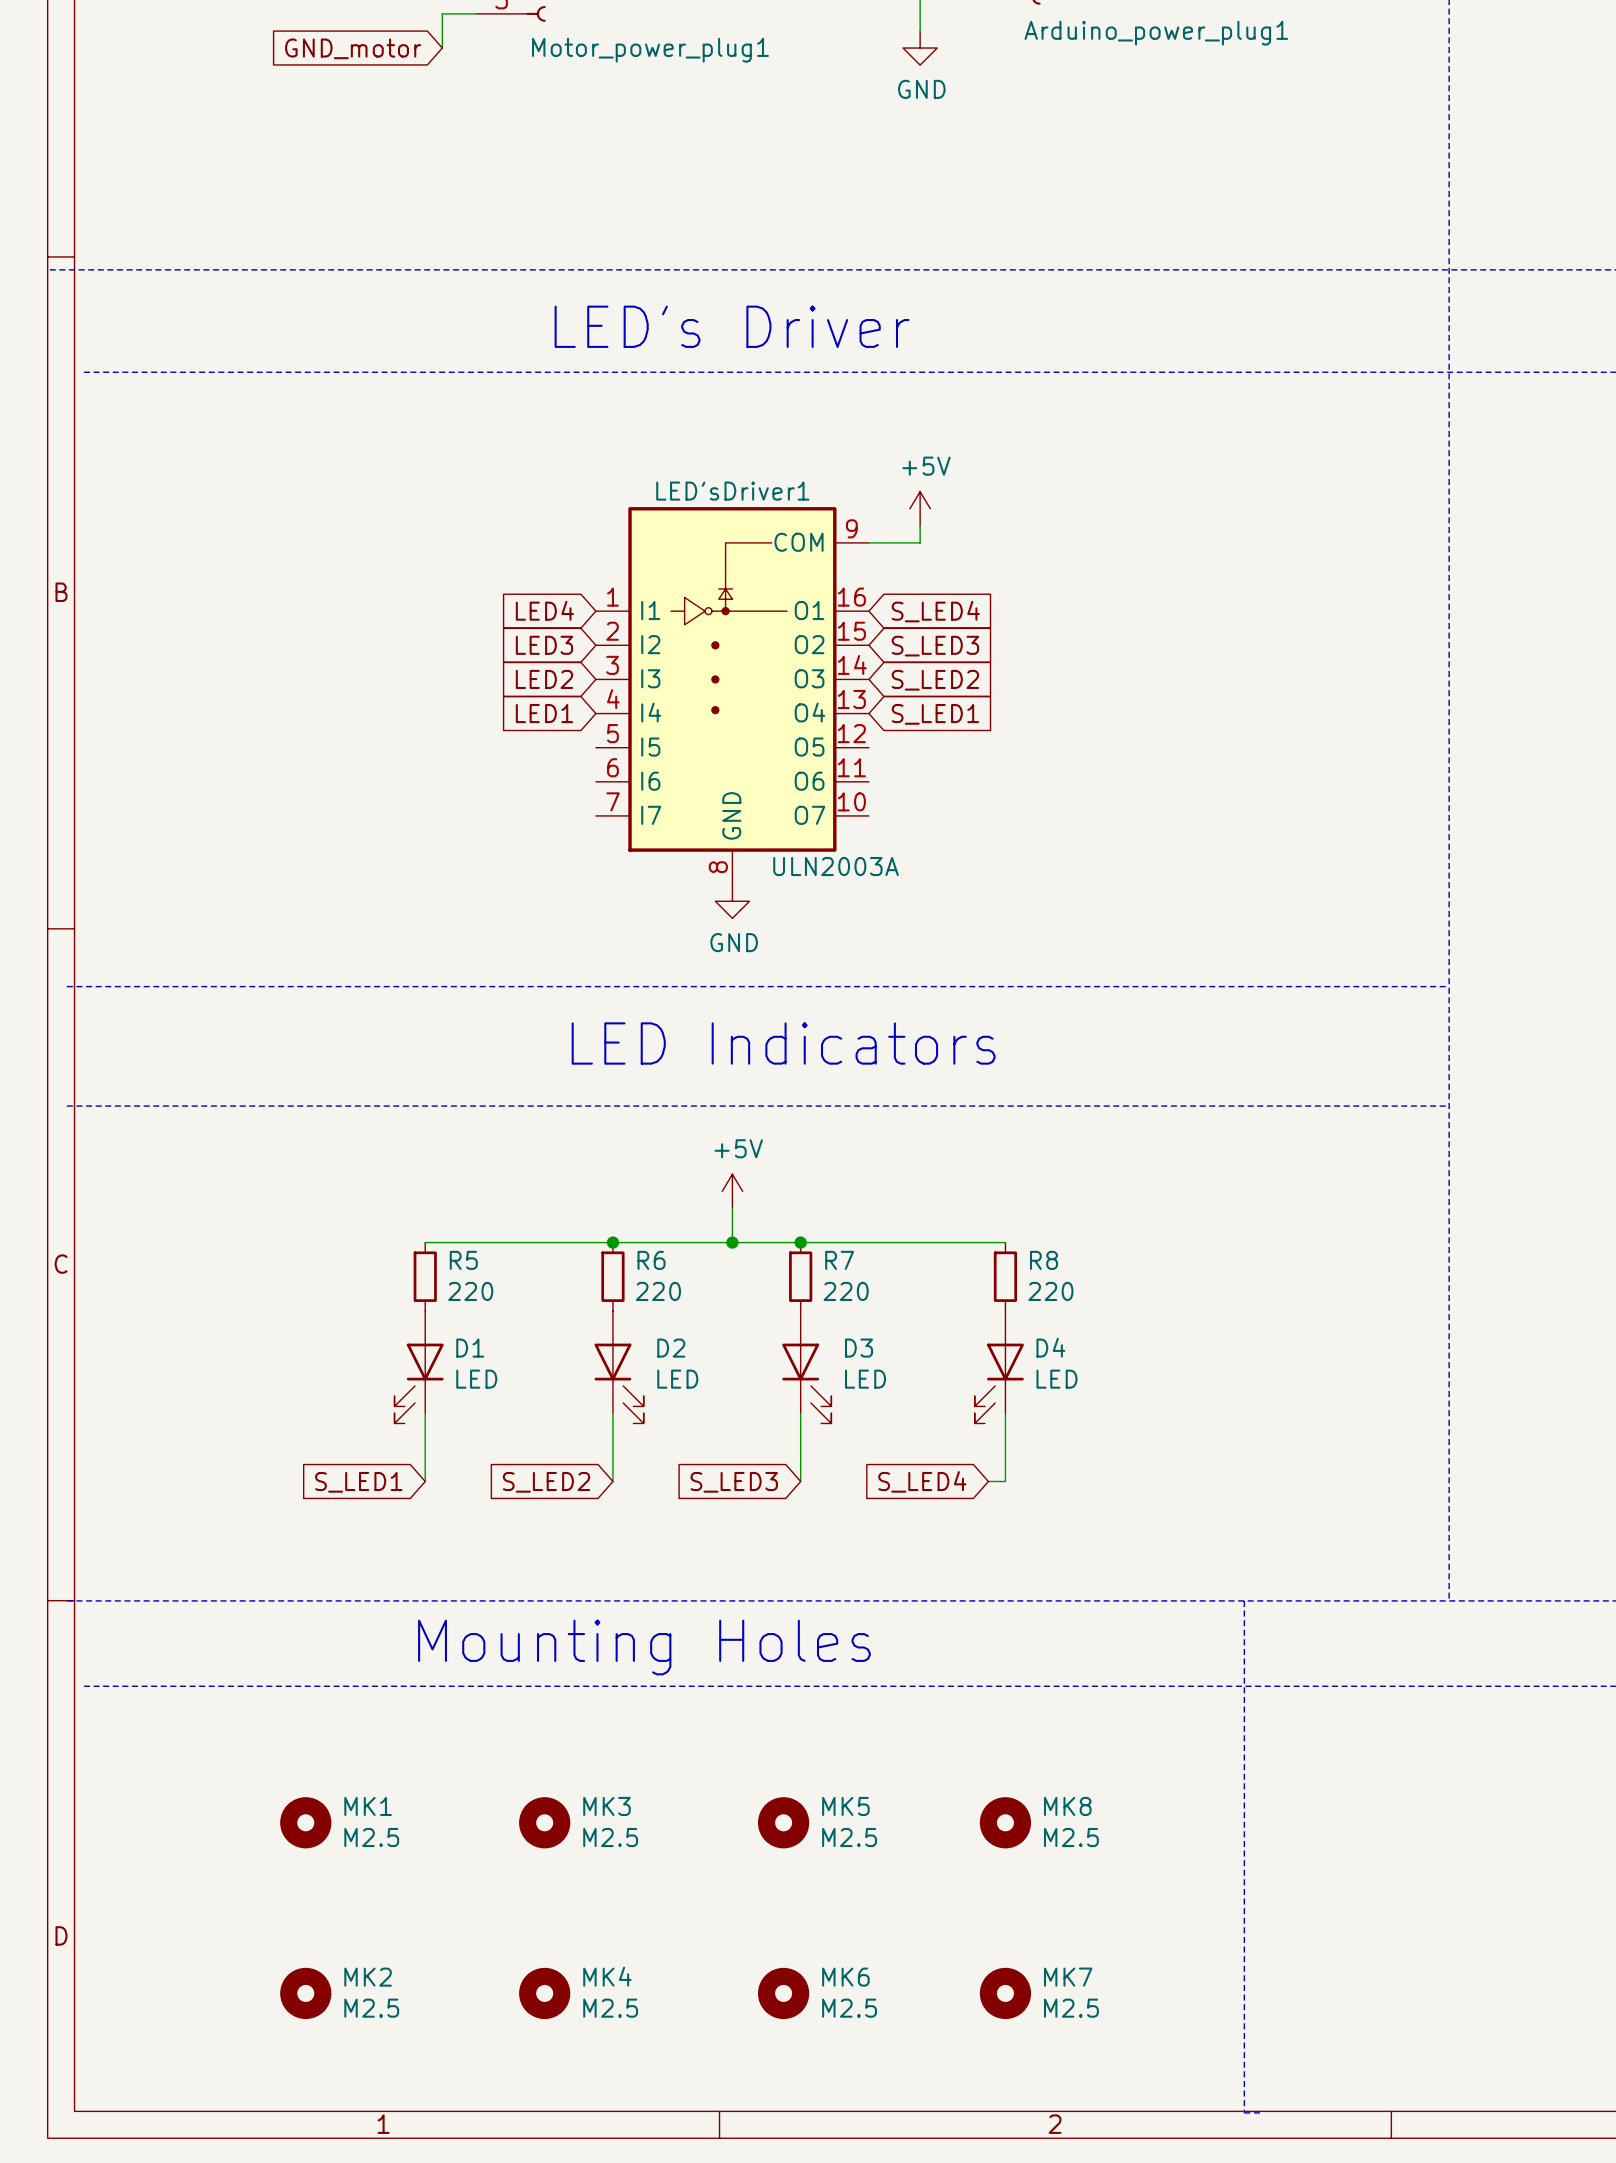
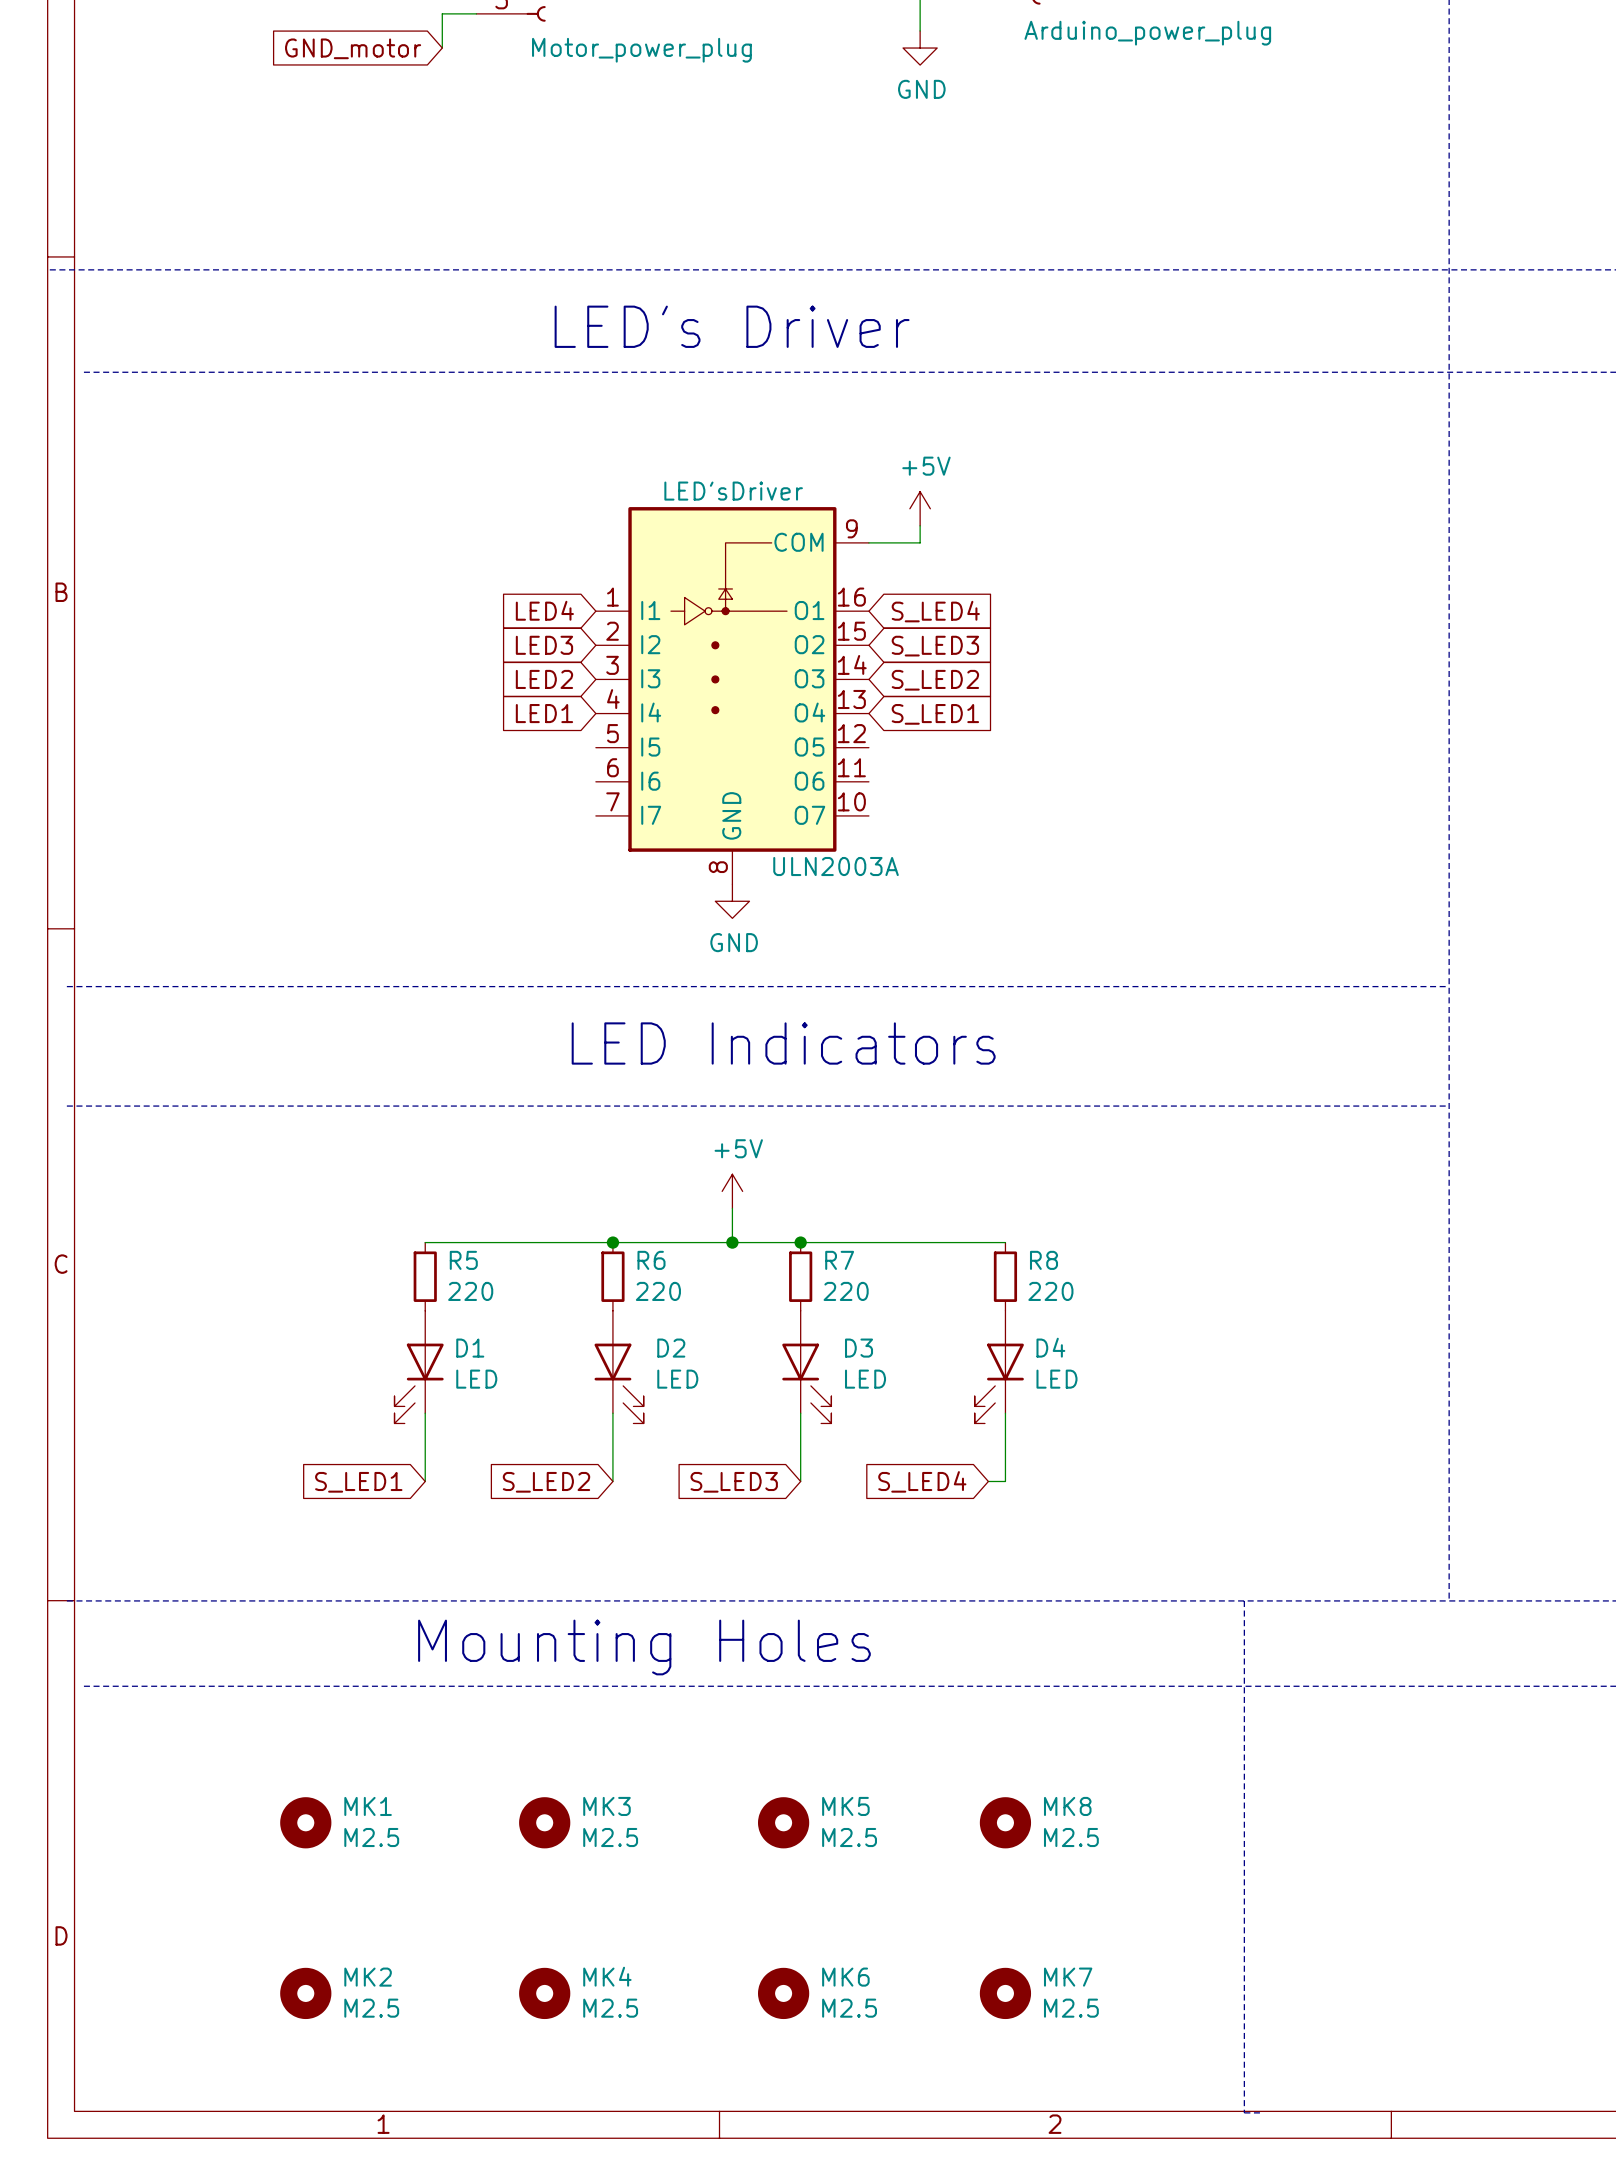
Arduino_power_plug1 name: Arduino_power_plug1 (1156, 33) -> Arduino_power_plug (1147, 33)
Motor_power_plug1 name: Motor_power_plug1 (650, 50) -> Motor_power_plug (641, 50)
LED'sDriver1 name: LED'sDriver1 (732, 491) -> LED'sDriver (733, 491)

